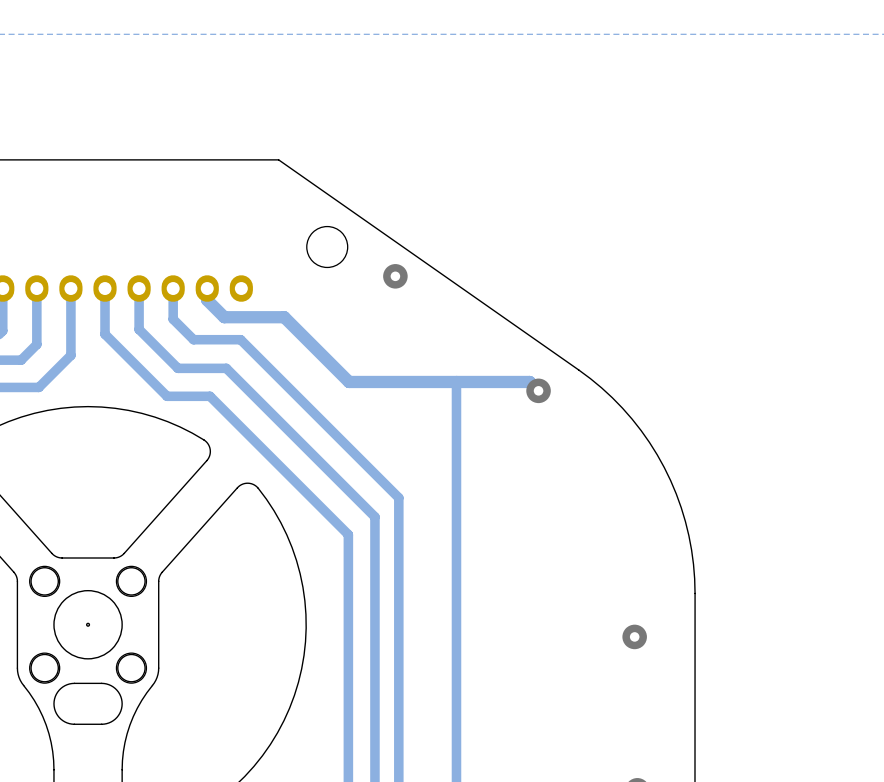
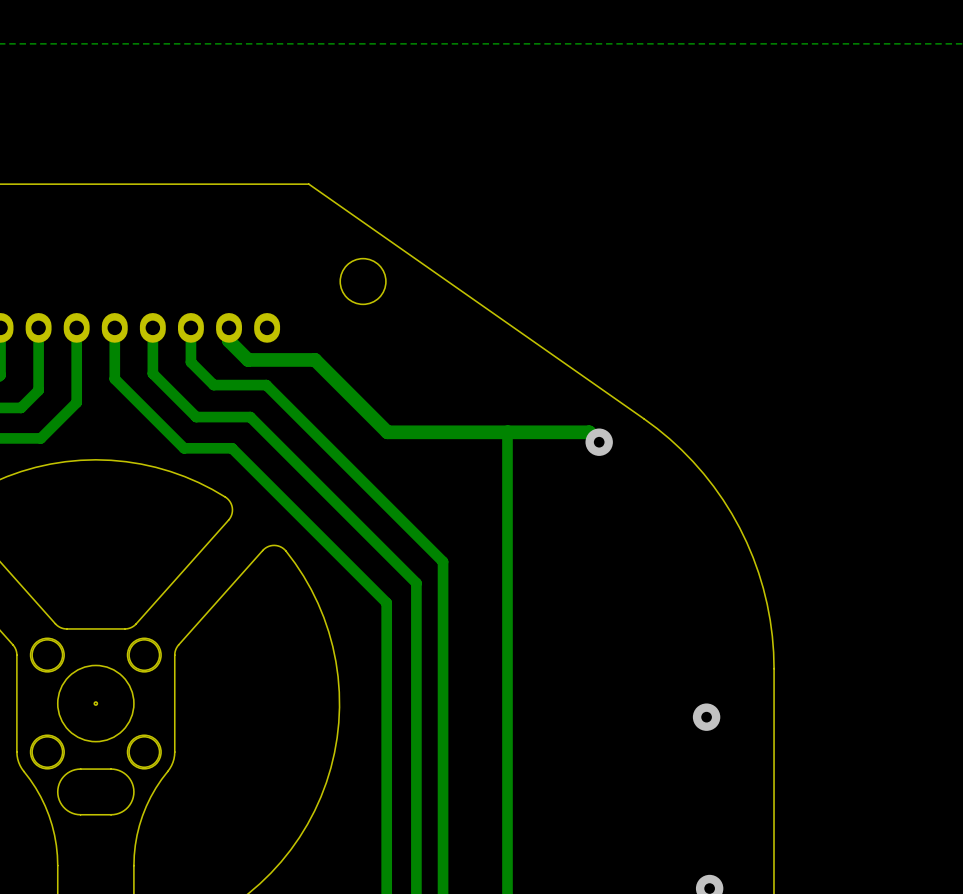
via: (395, 276) -> none

